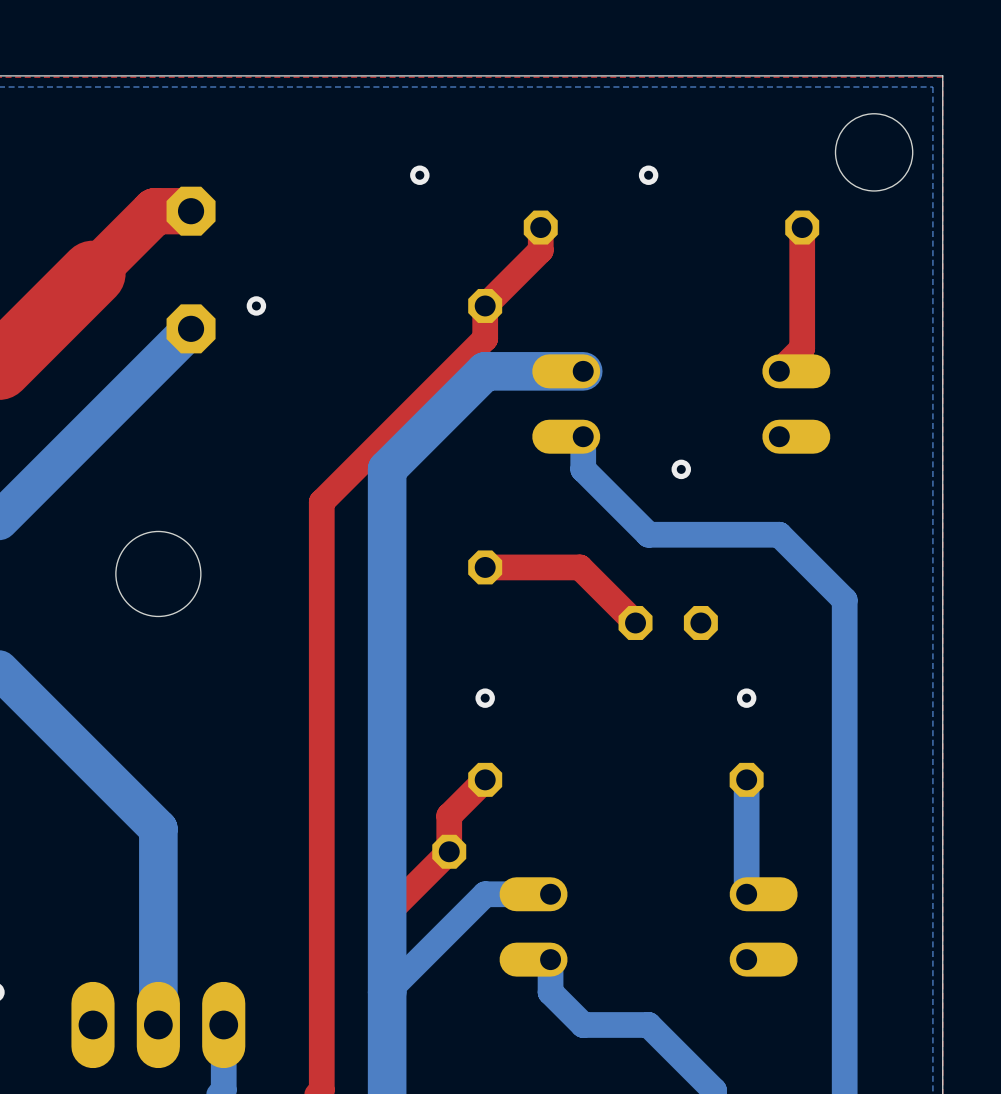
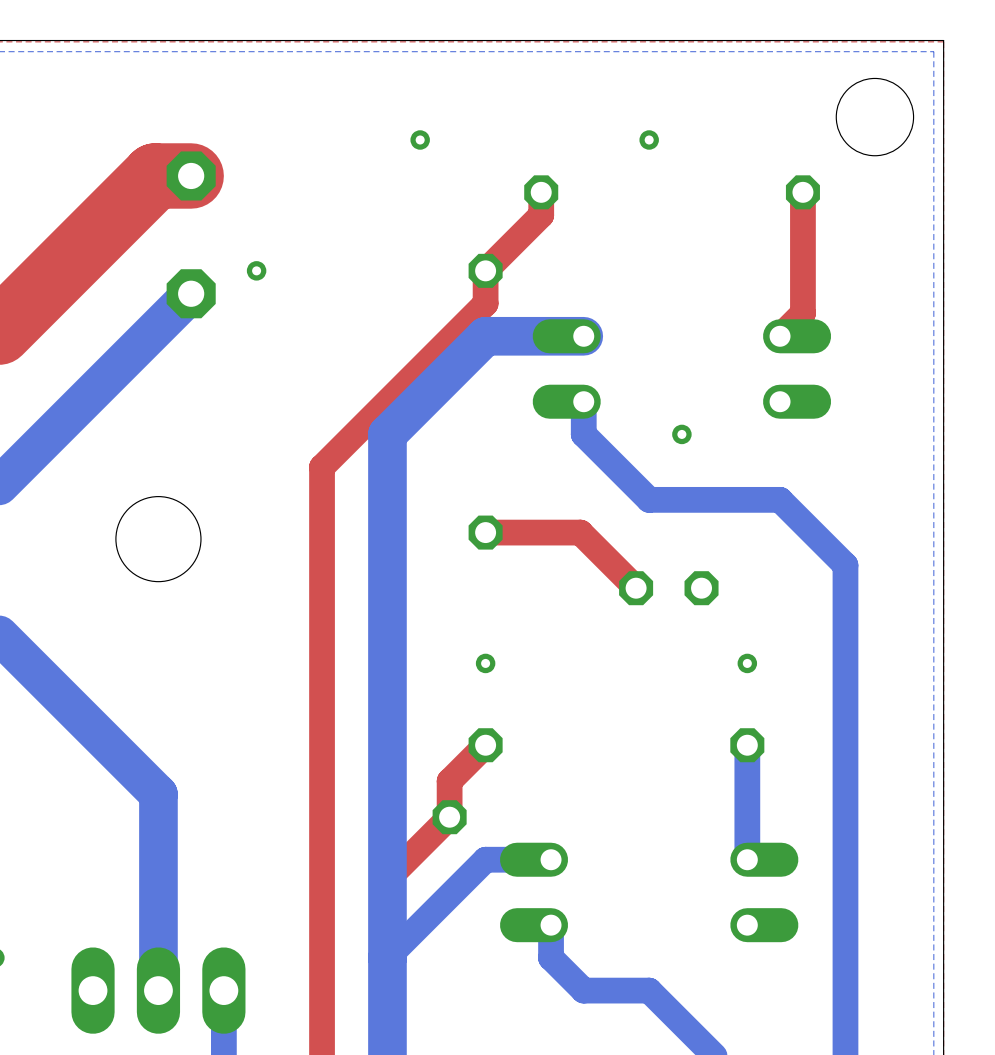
top track width: thin (191, 211) (155, 211) (93, 273) -> thick (191, 175) (155, 175) (93, 238)

